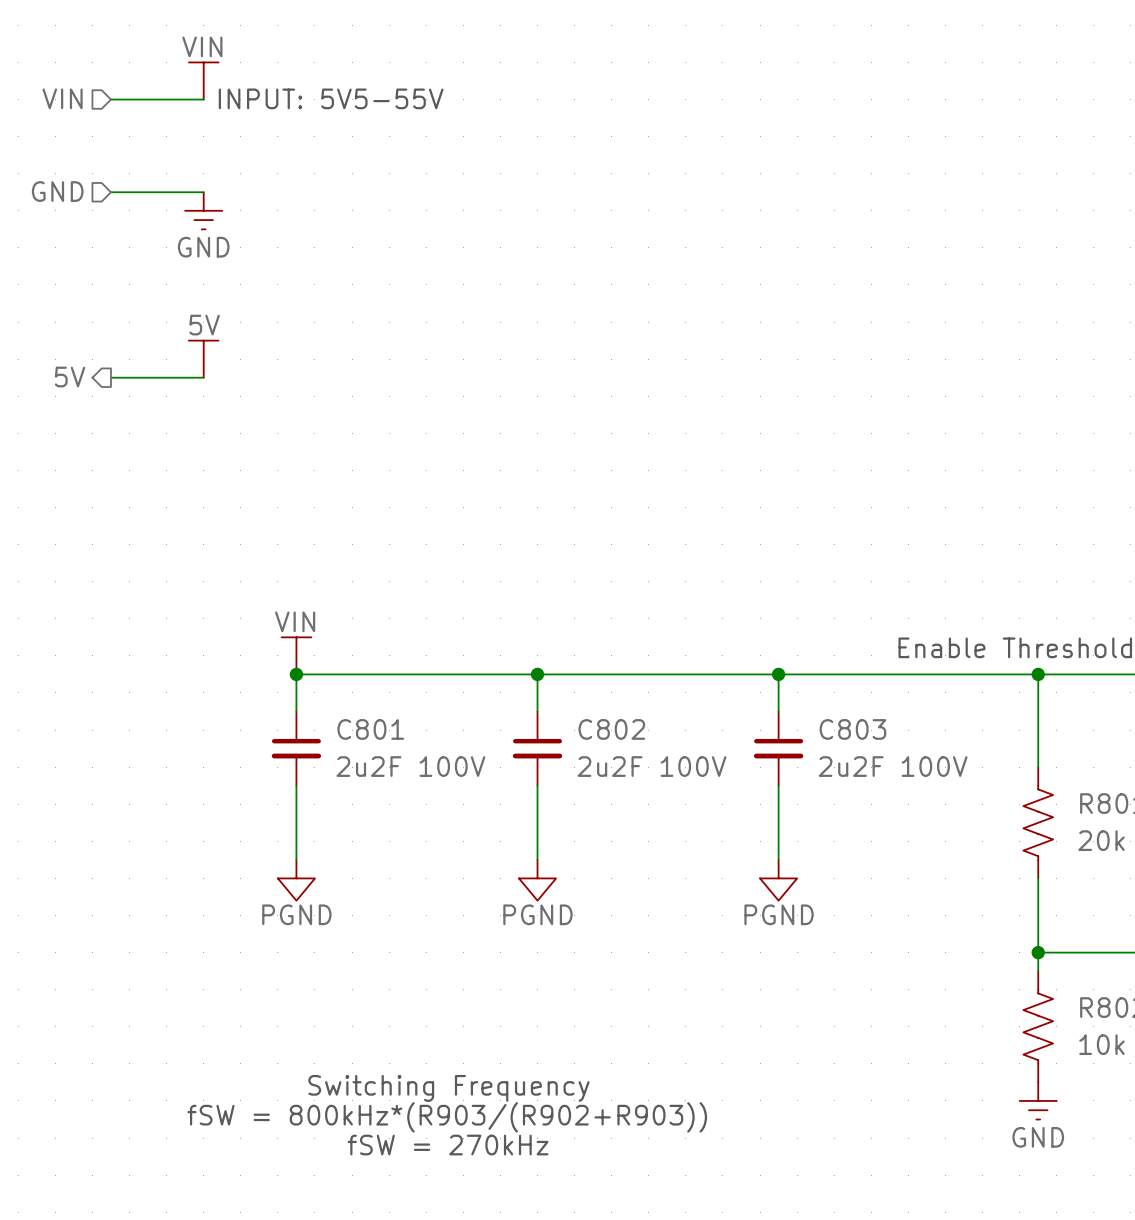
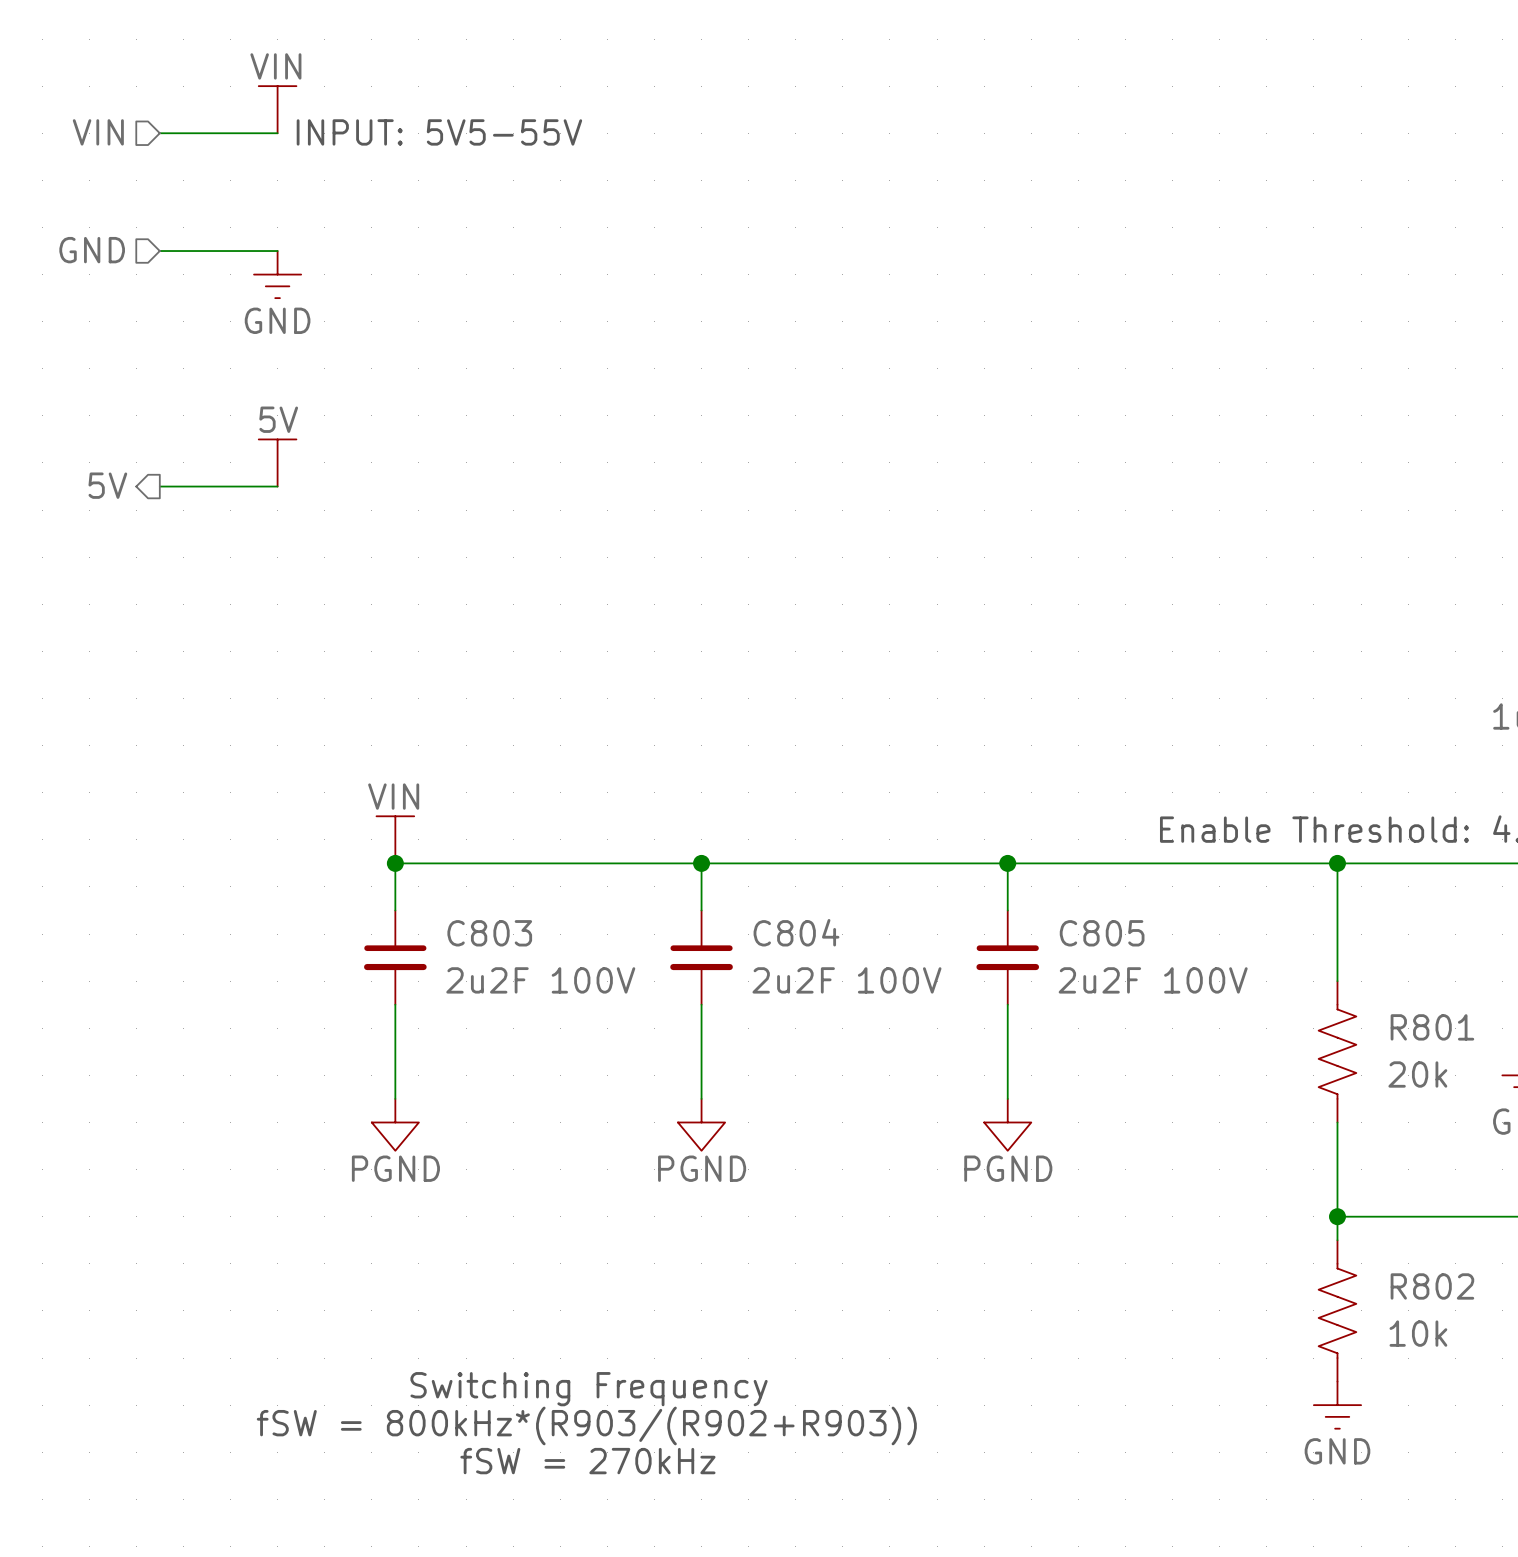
C801 name: C801 (370, 729) -> C803 (489, 933)
C802 name: C802 (611, 729) -> C804 (796, 932)
C803 name: C803 (852, 729) -> C805 (1102, 933)

